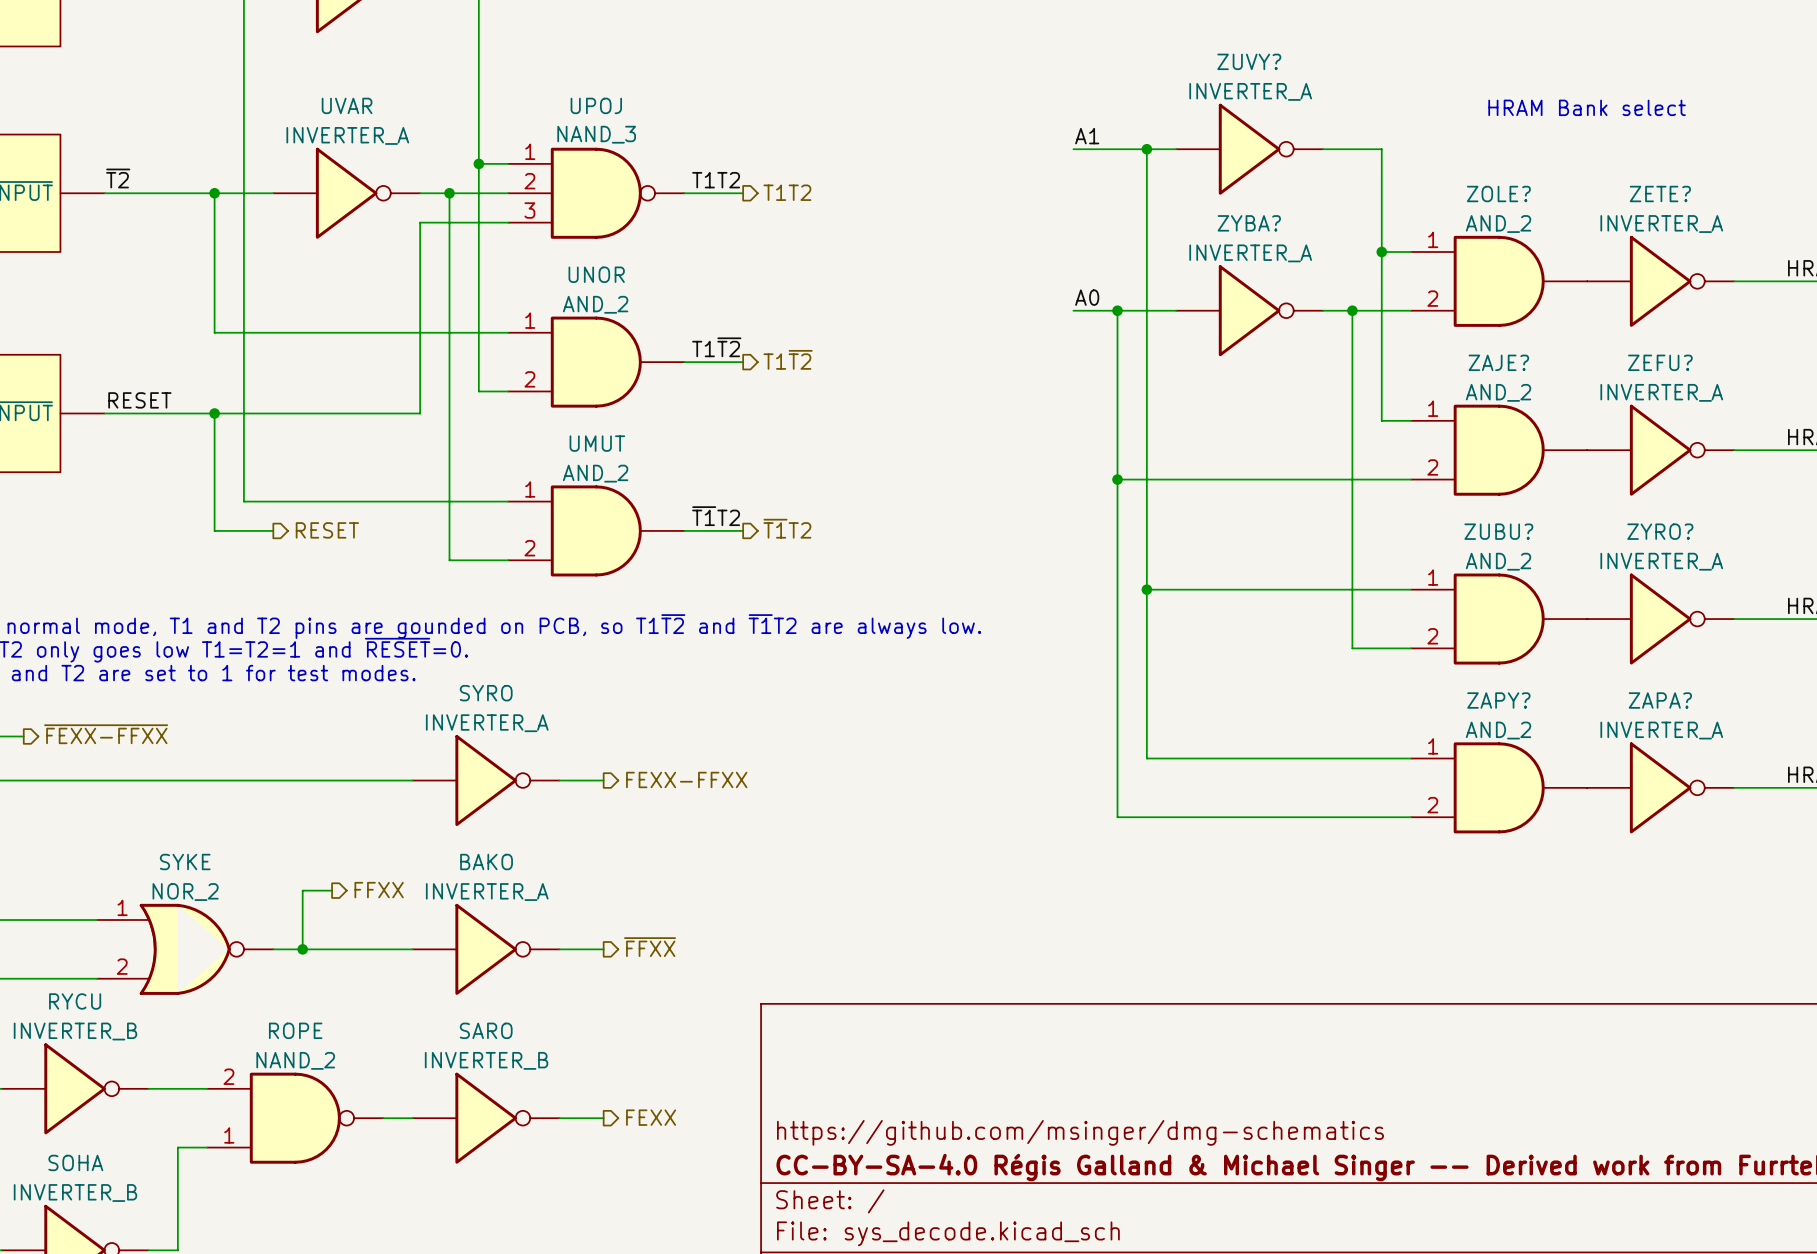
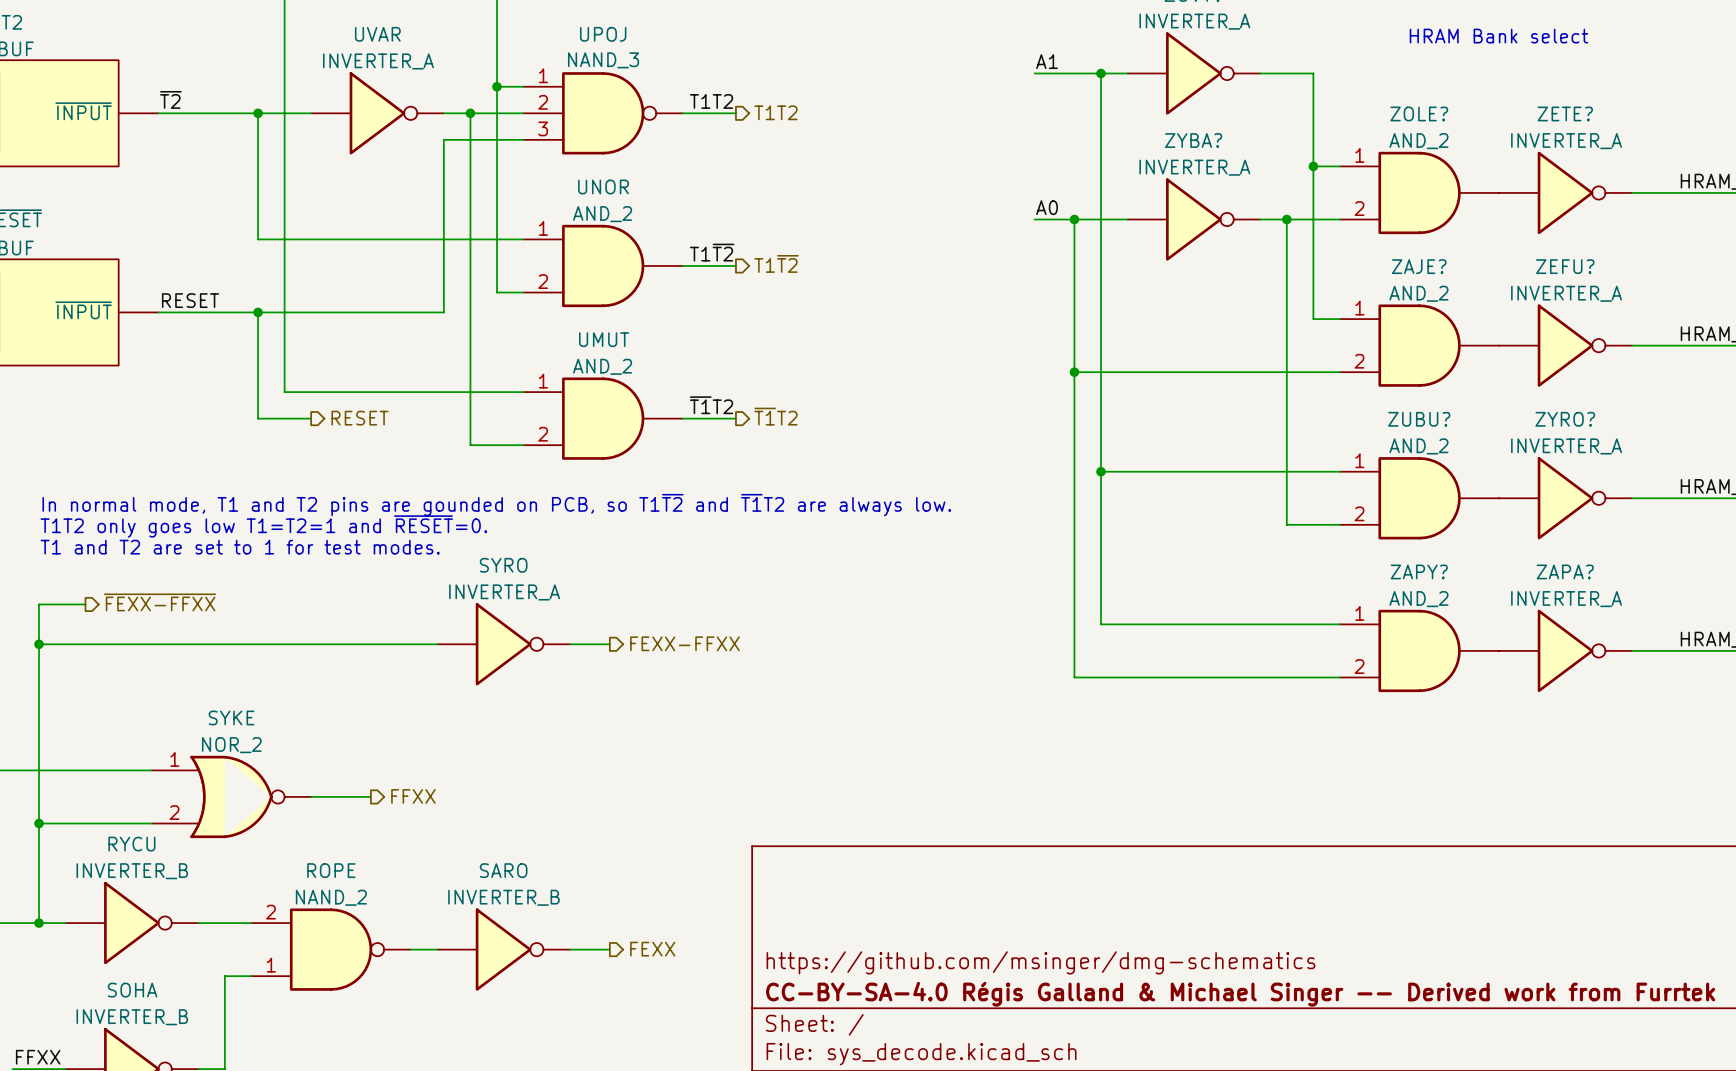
wire: (332, 890) (302, 890) (302, 949) -> none
hierarchical label position: FFXX (379, 890) -> FFXX (413, 796)
hierarchical label: ~{FFXX} (650, 947) -> none
junction: (302, 949) -> none
wire: (339, 949) (412, 949) -> none
BAKO: INVERTER_A (486, 949) -> none
wire: (559, 949) (603, 949) -> none

